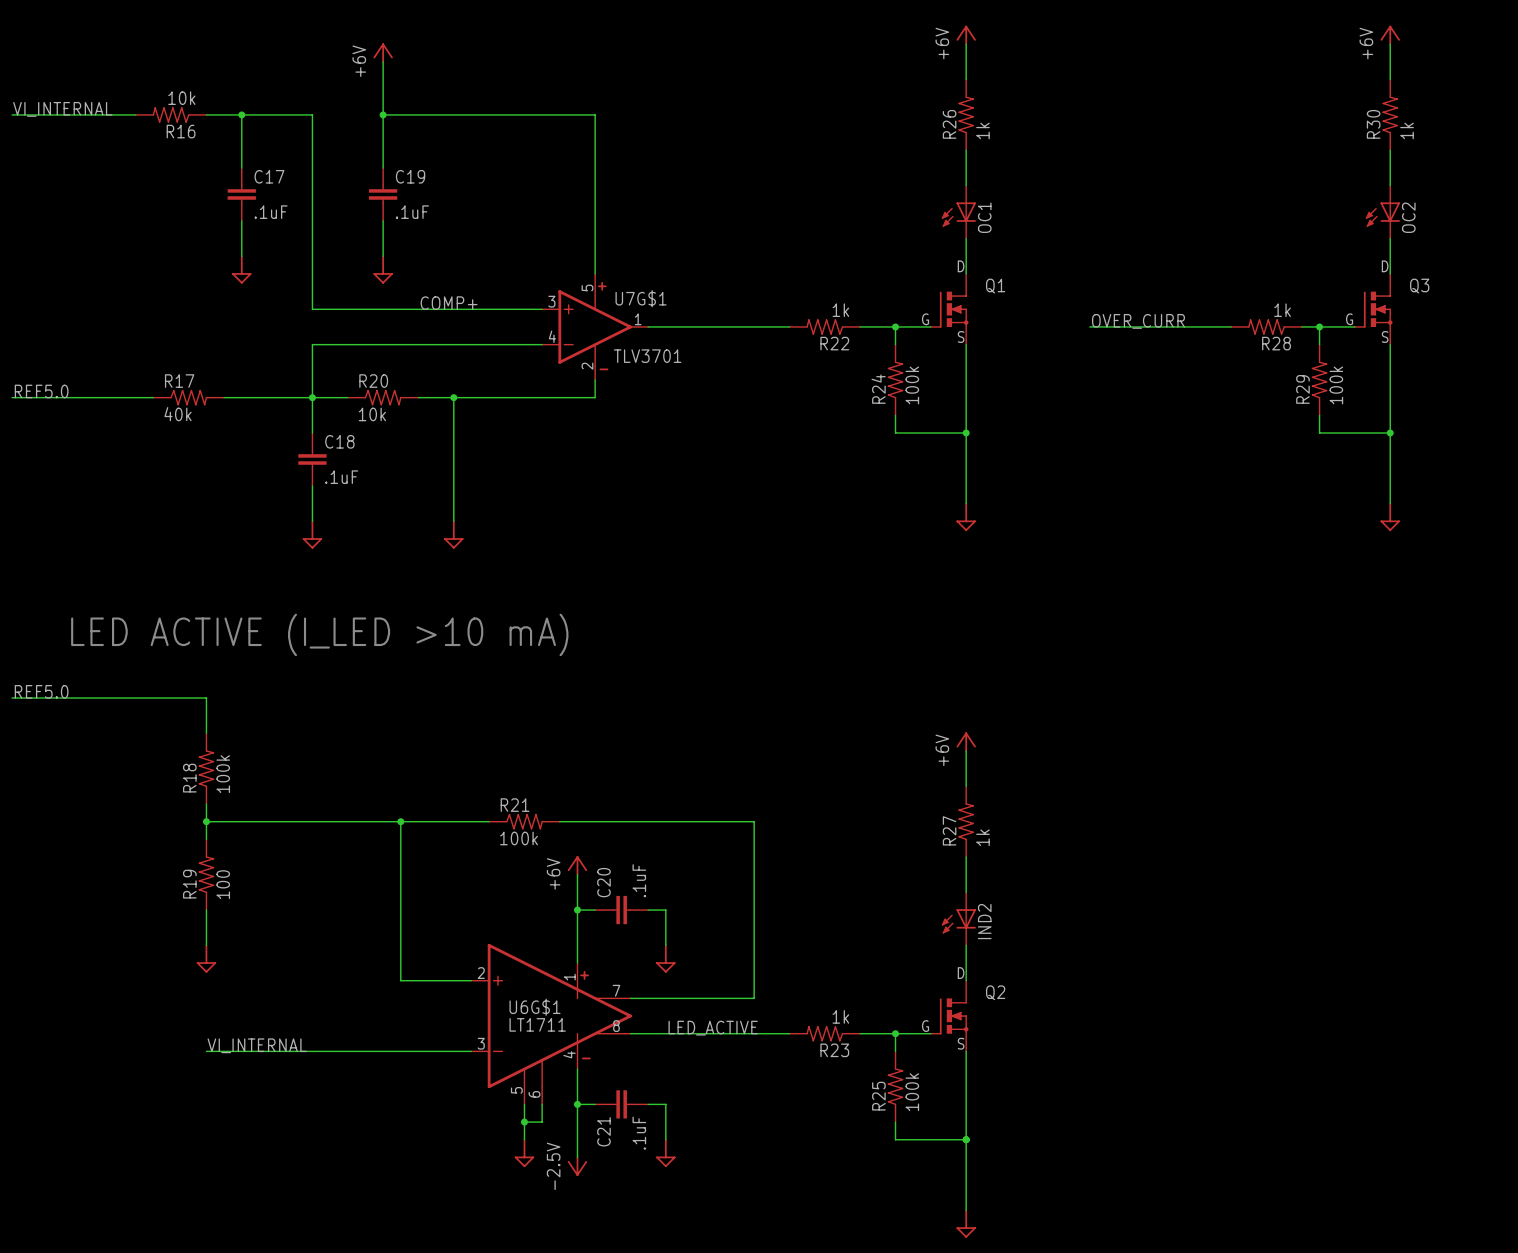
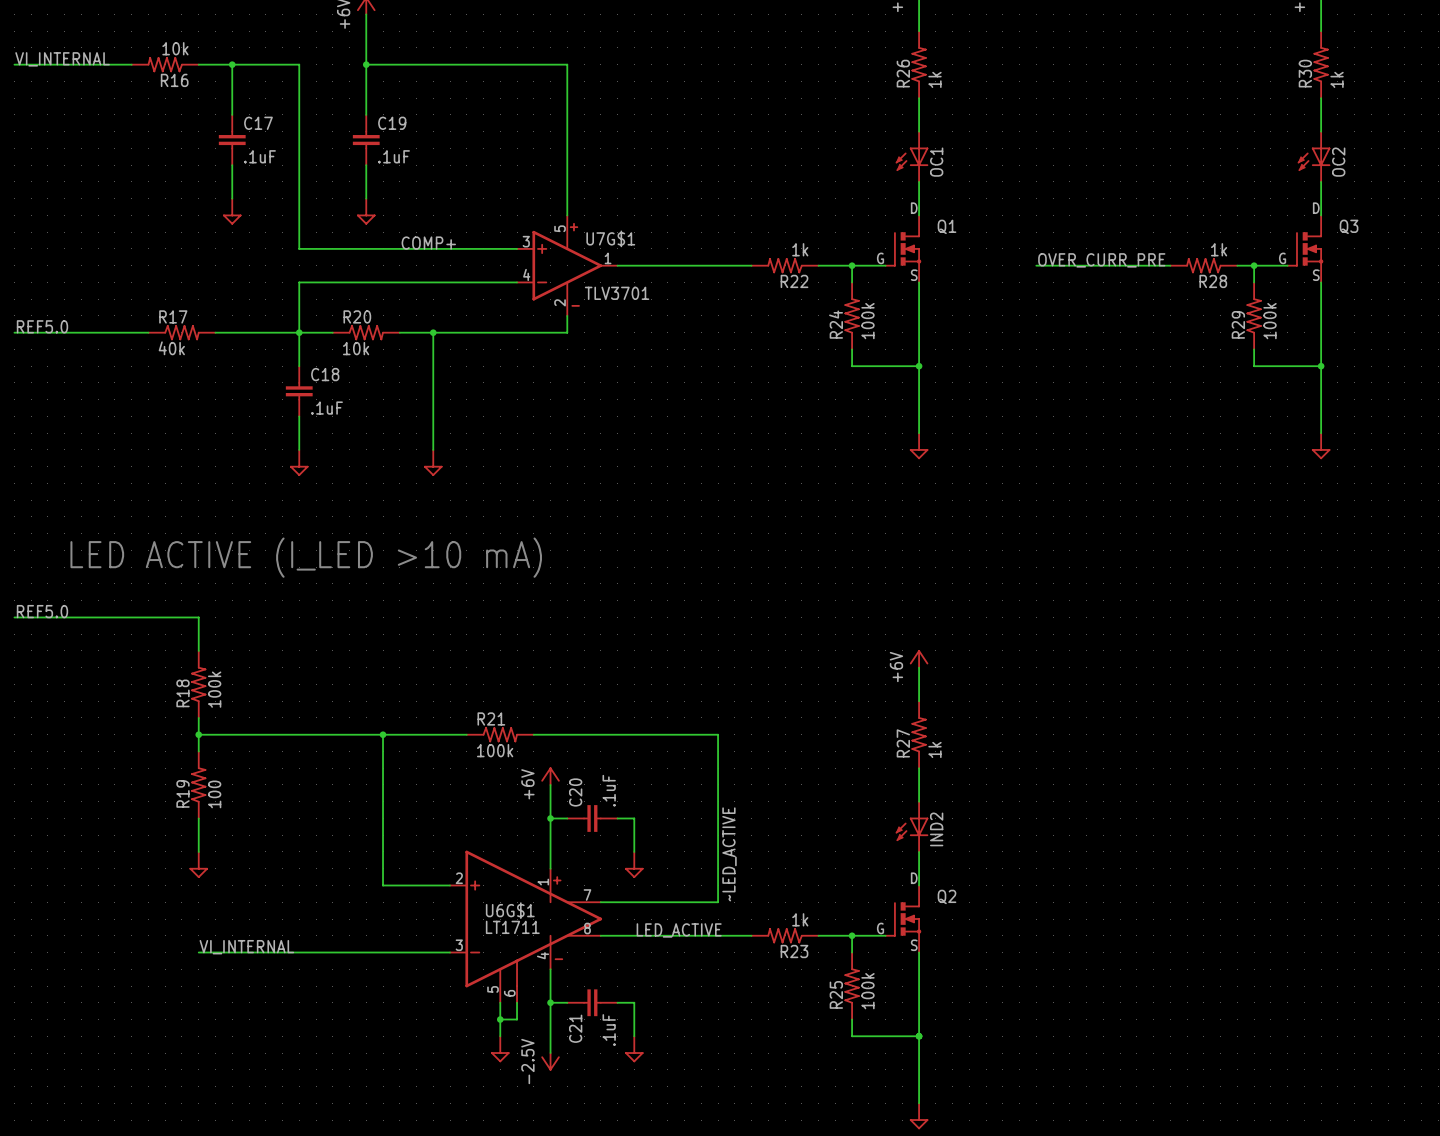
label: OVER_CURR (1138, 321) -> OVER_CURR_PRE (1101, 260)
label: none -> ~LED_ACTIVE (729, 854)

